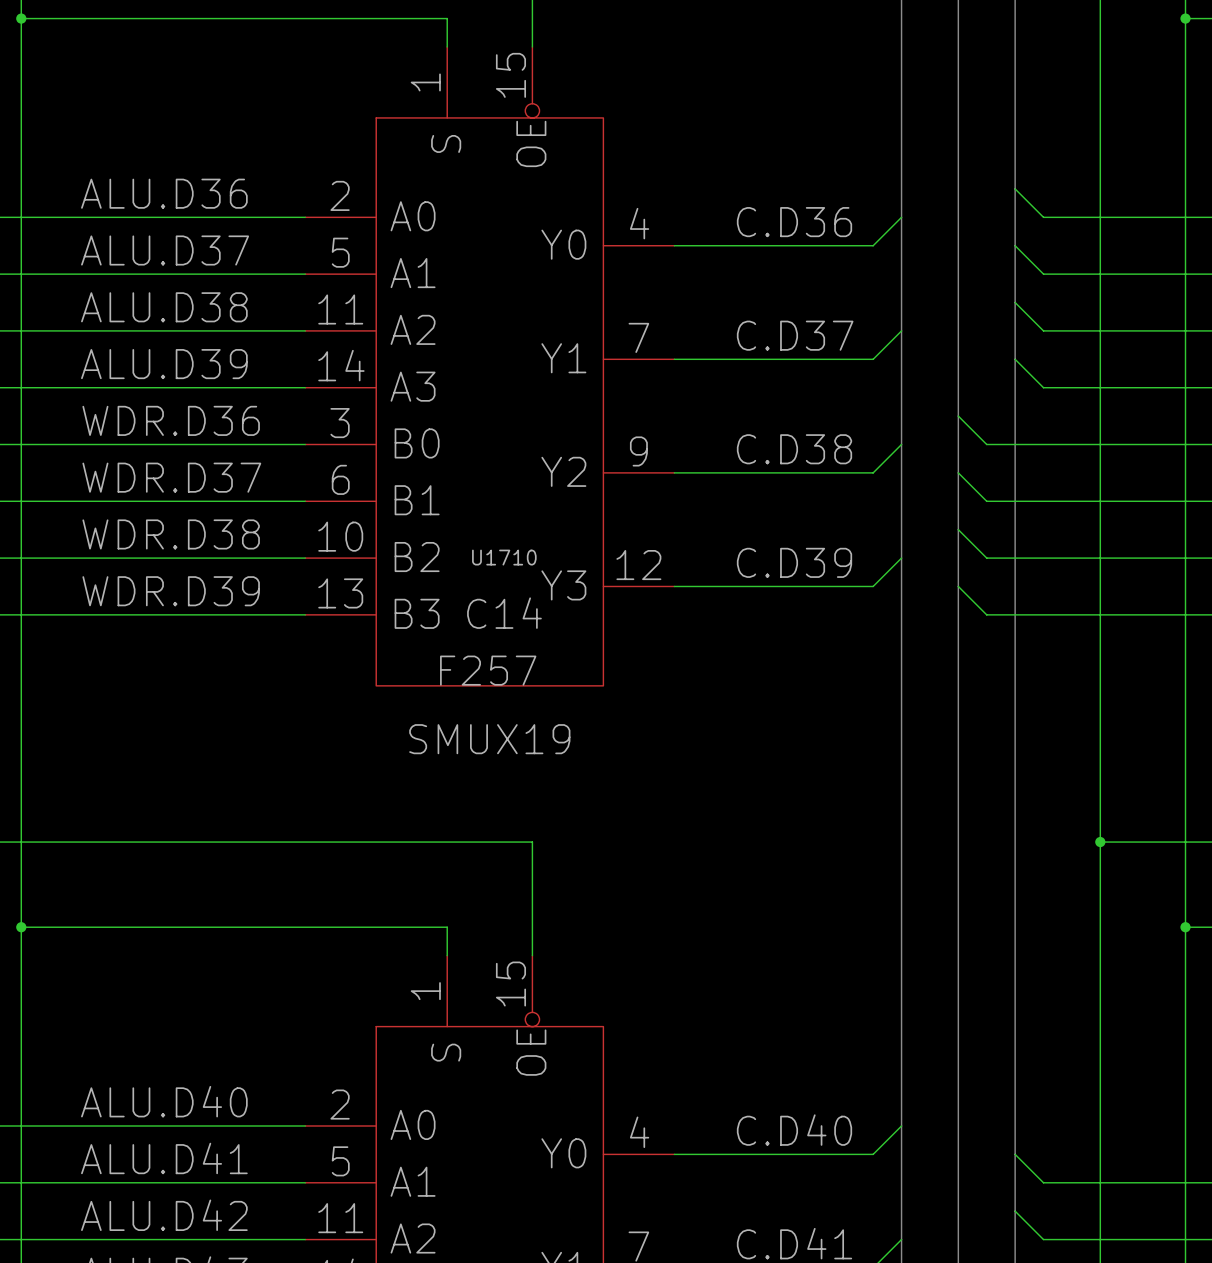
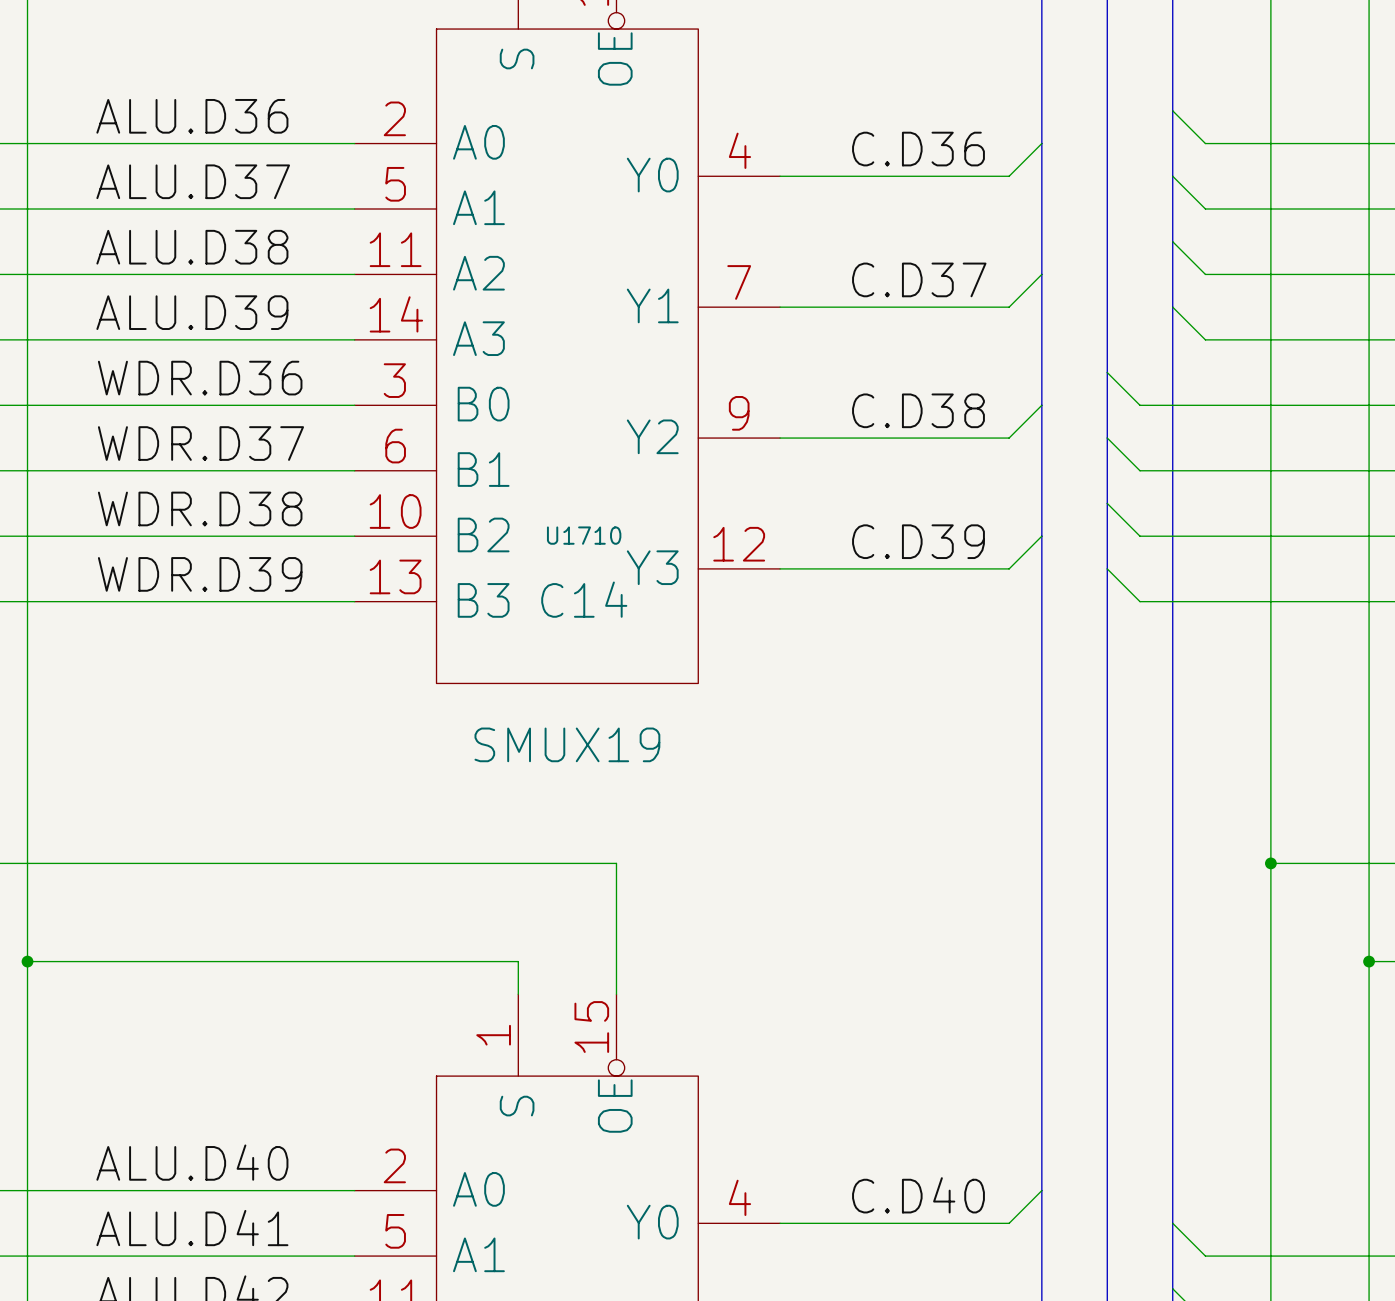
U1710 value: F257 (488, 670) -> none

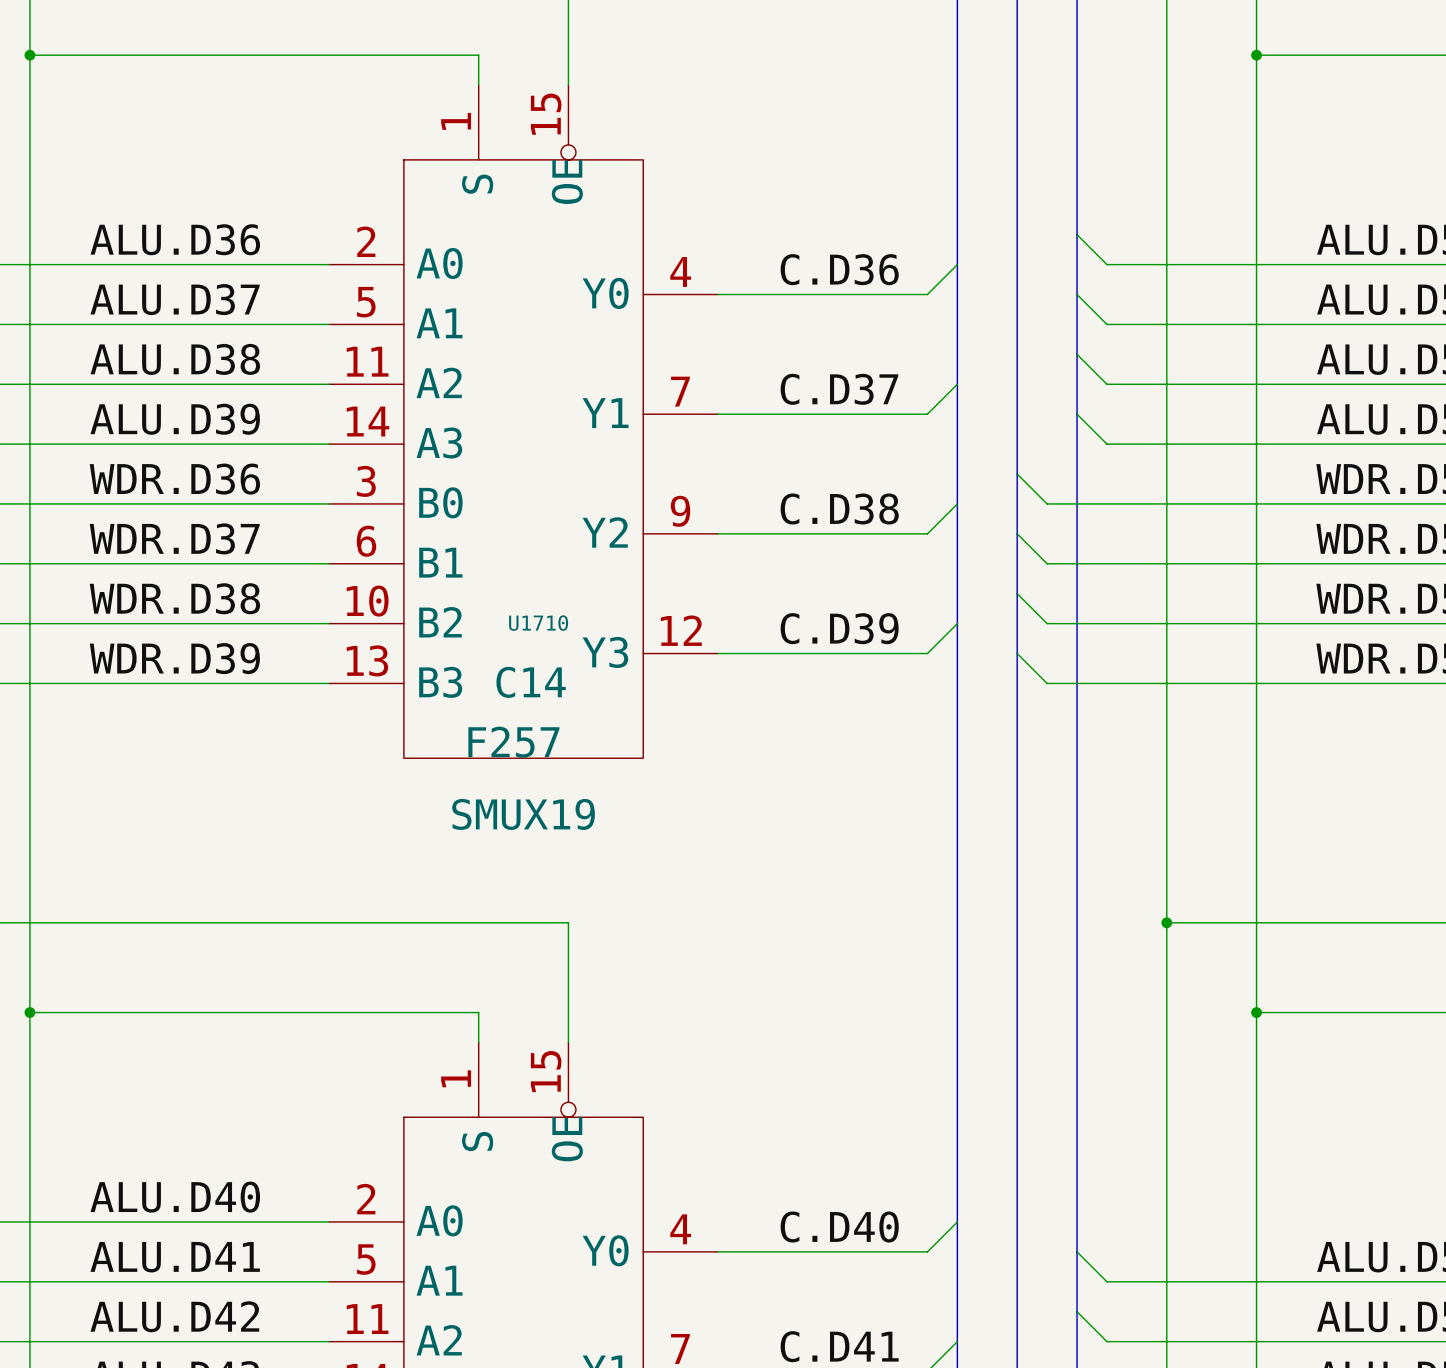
U1710 value: none -> F257 (513, 742)

